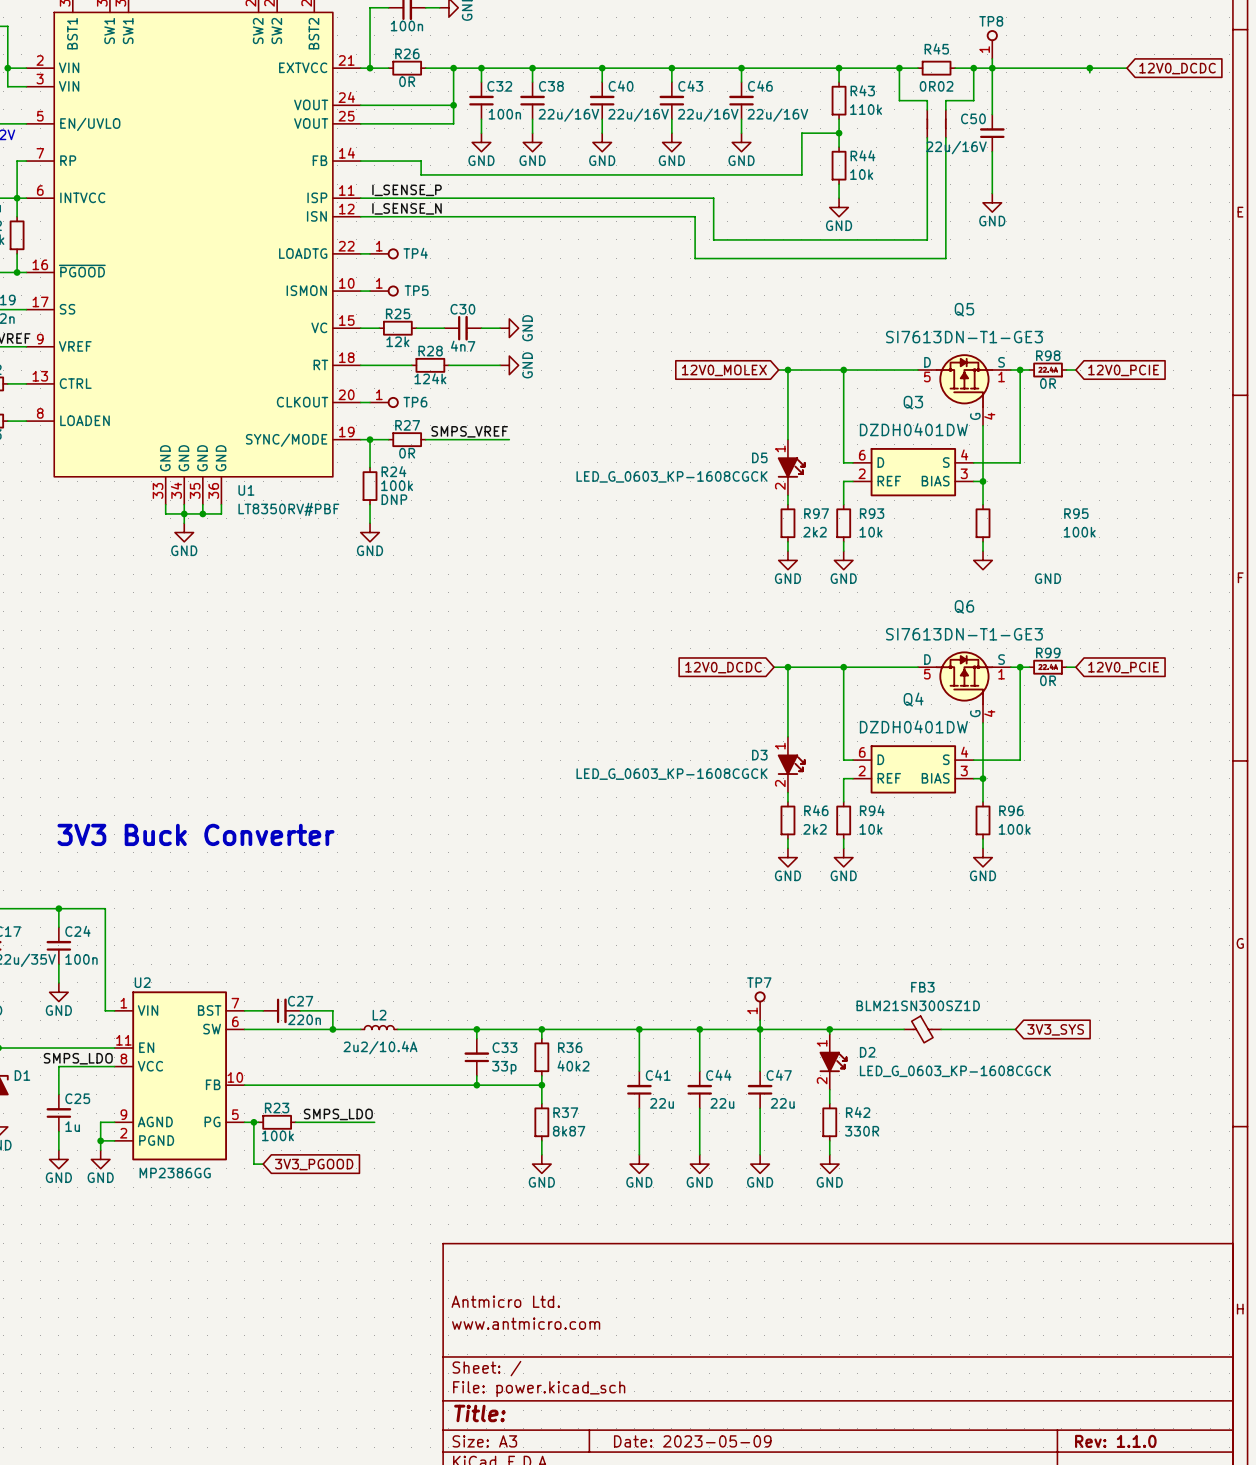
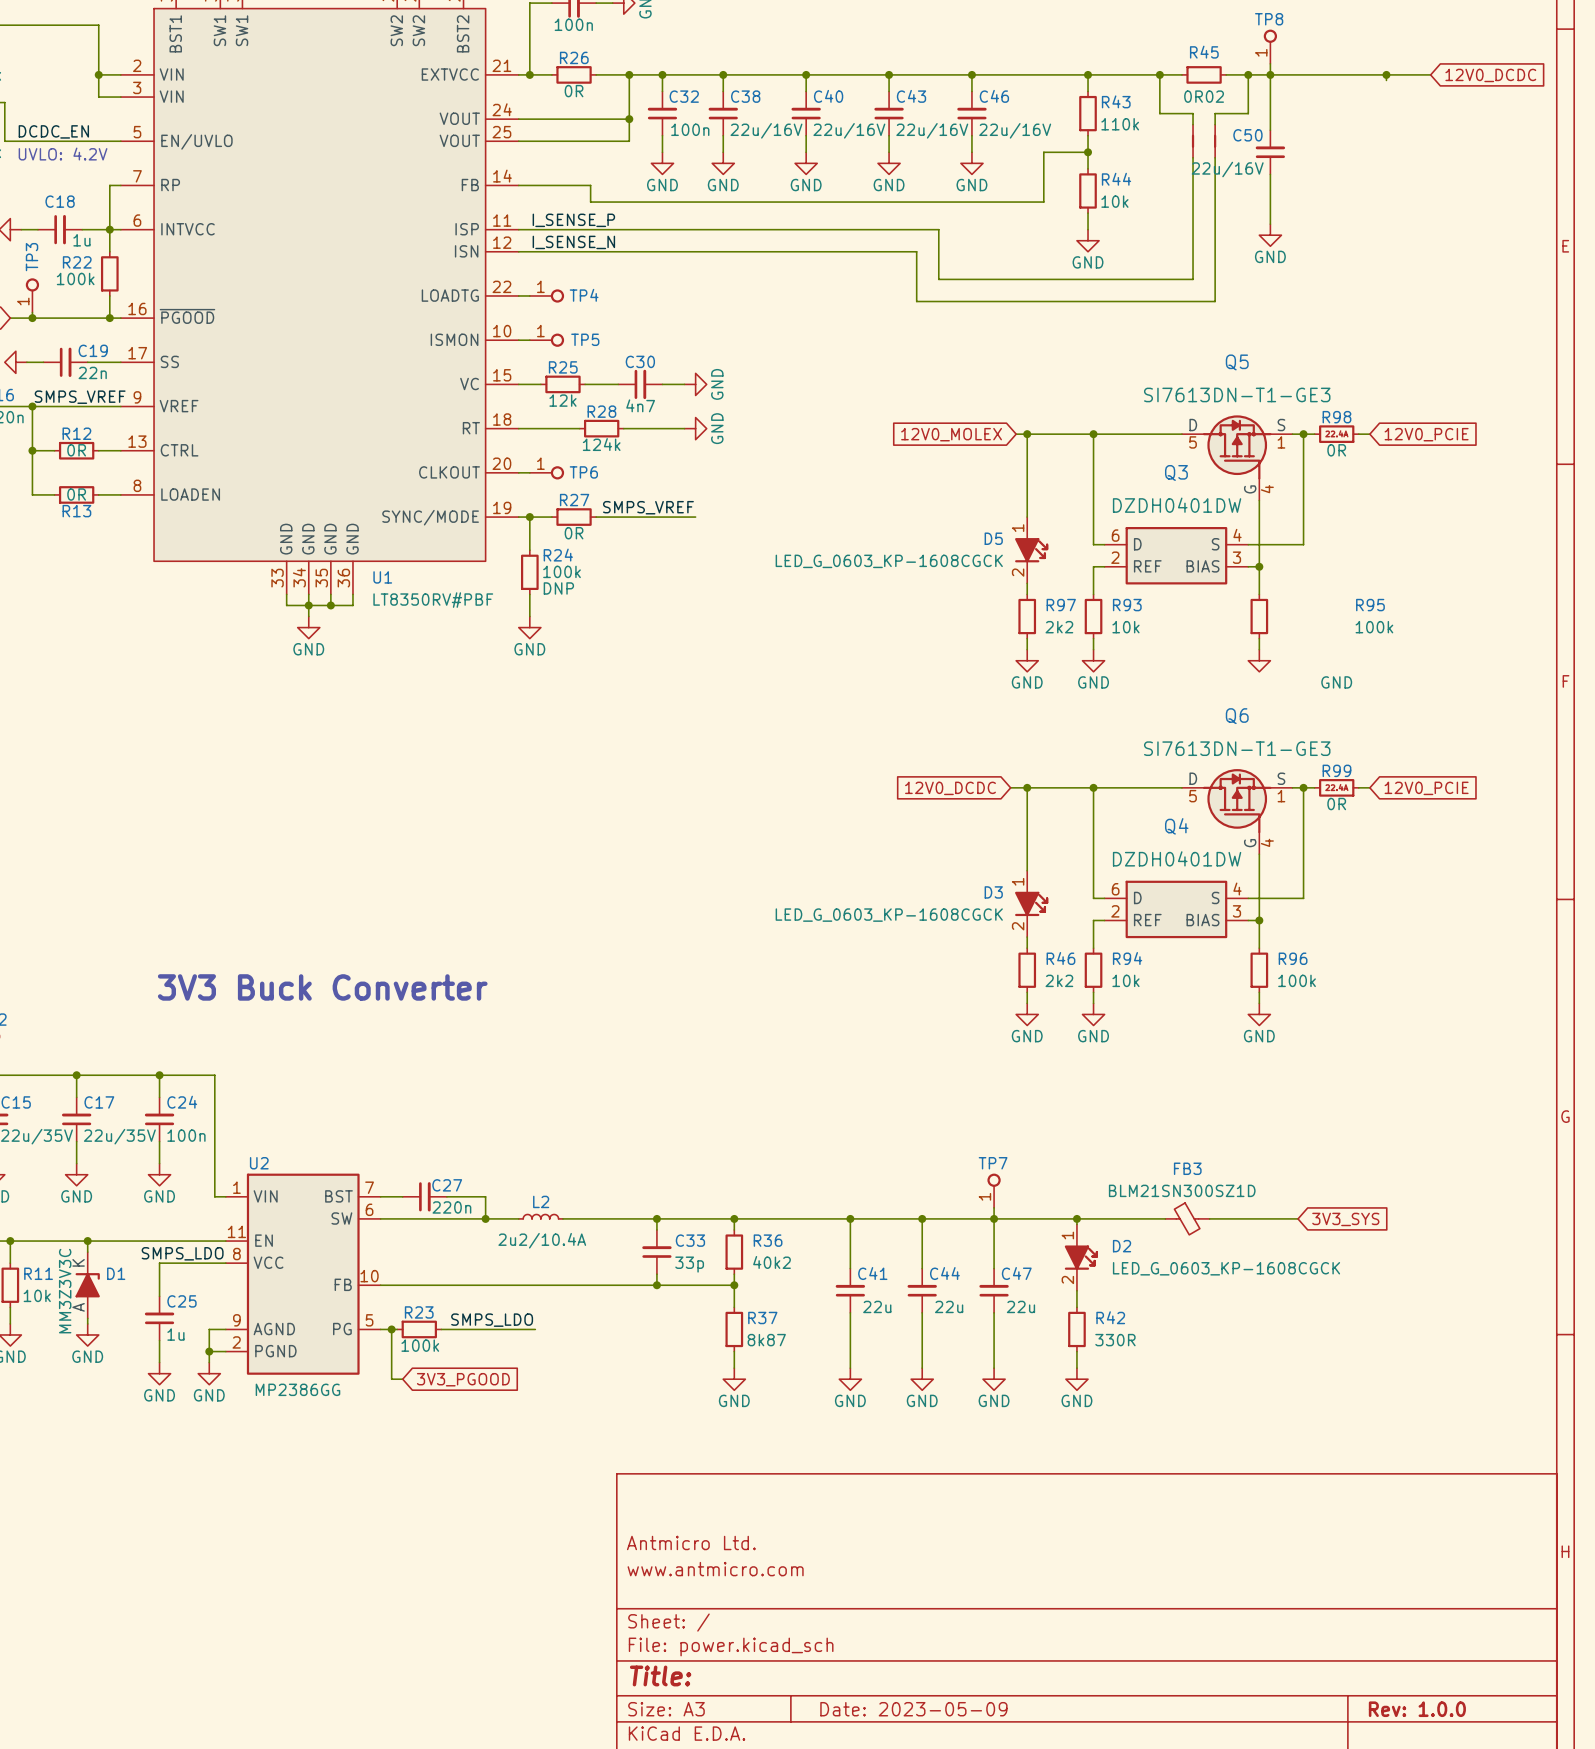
title block: Rev: 1.1.0 (1115, 1441) -> Rev: 1.0.0 (1417, 1709)

